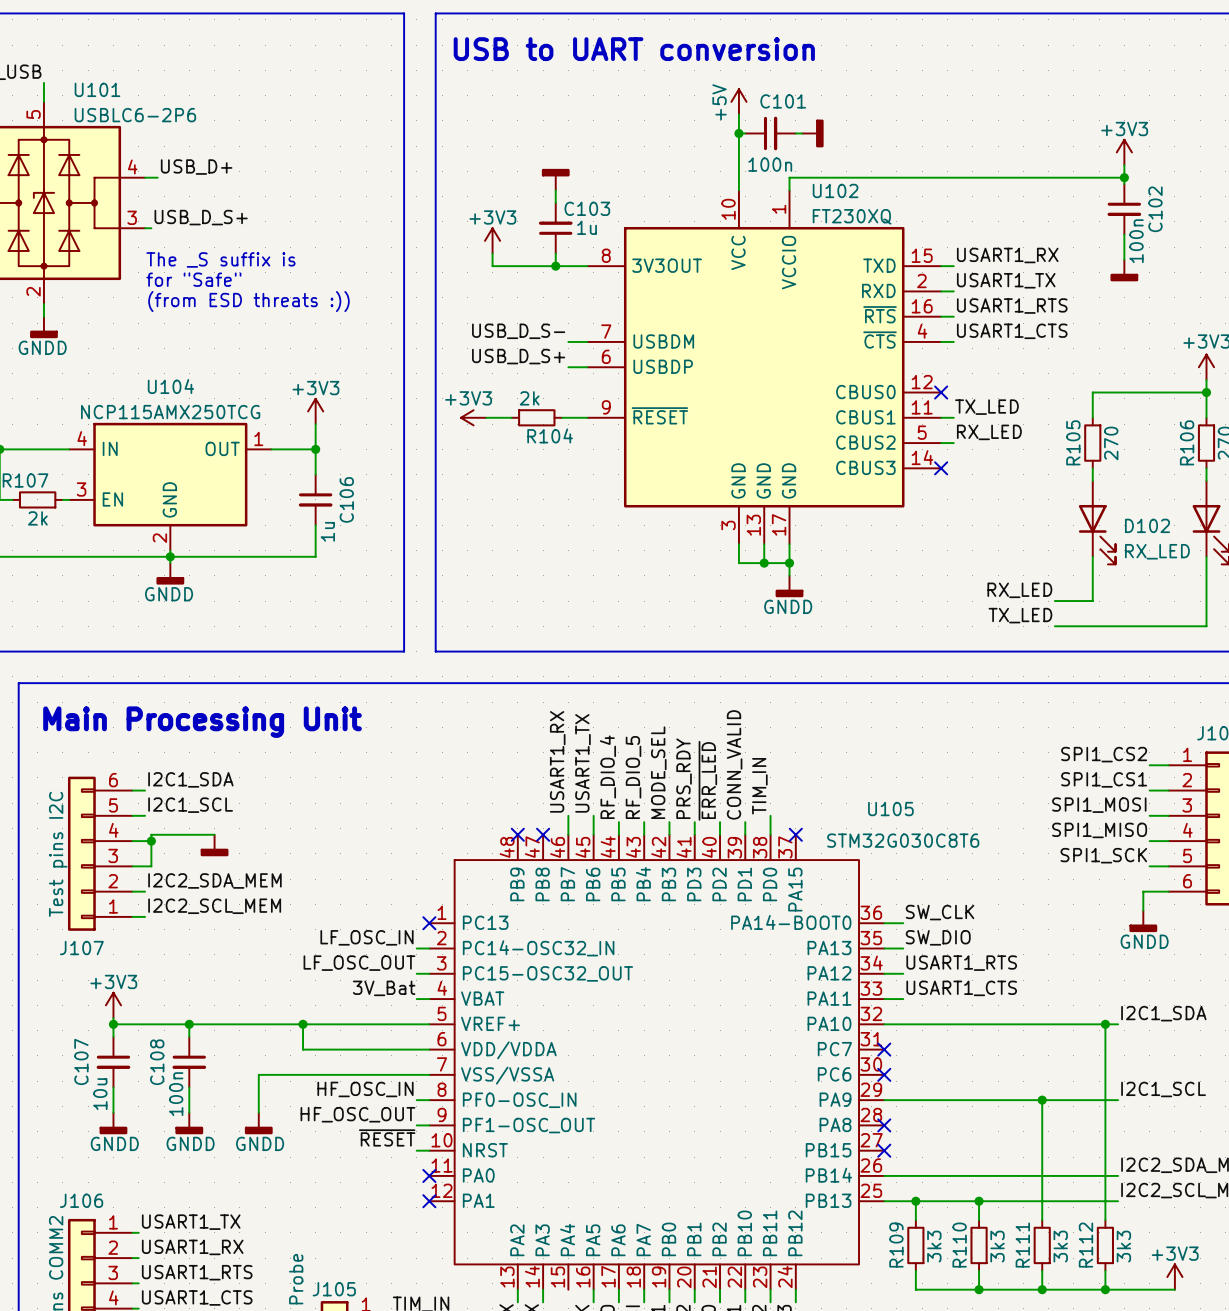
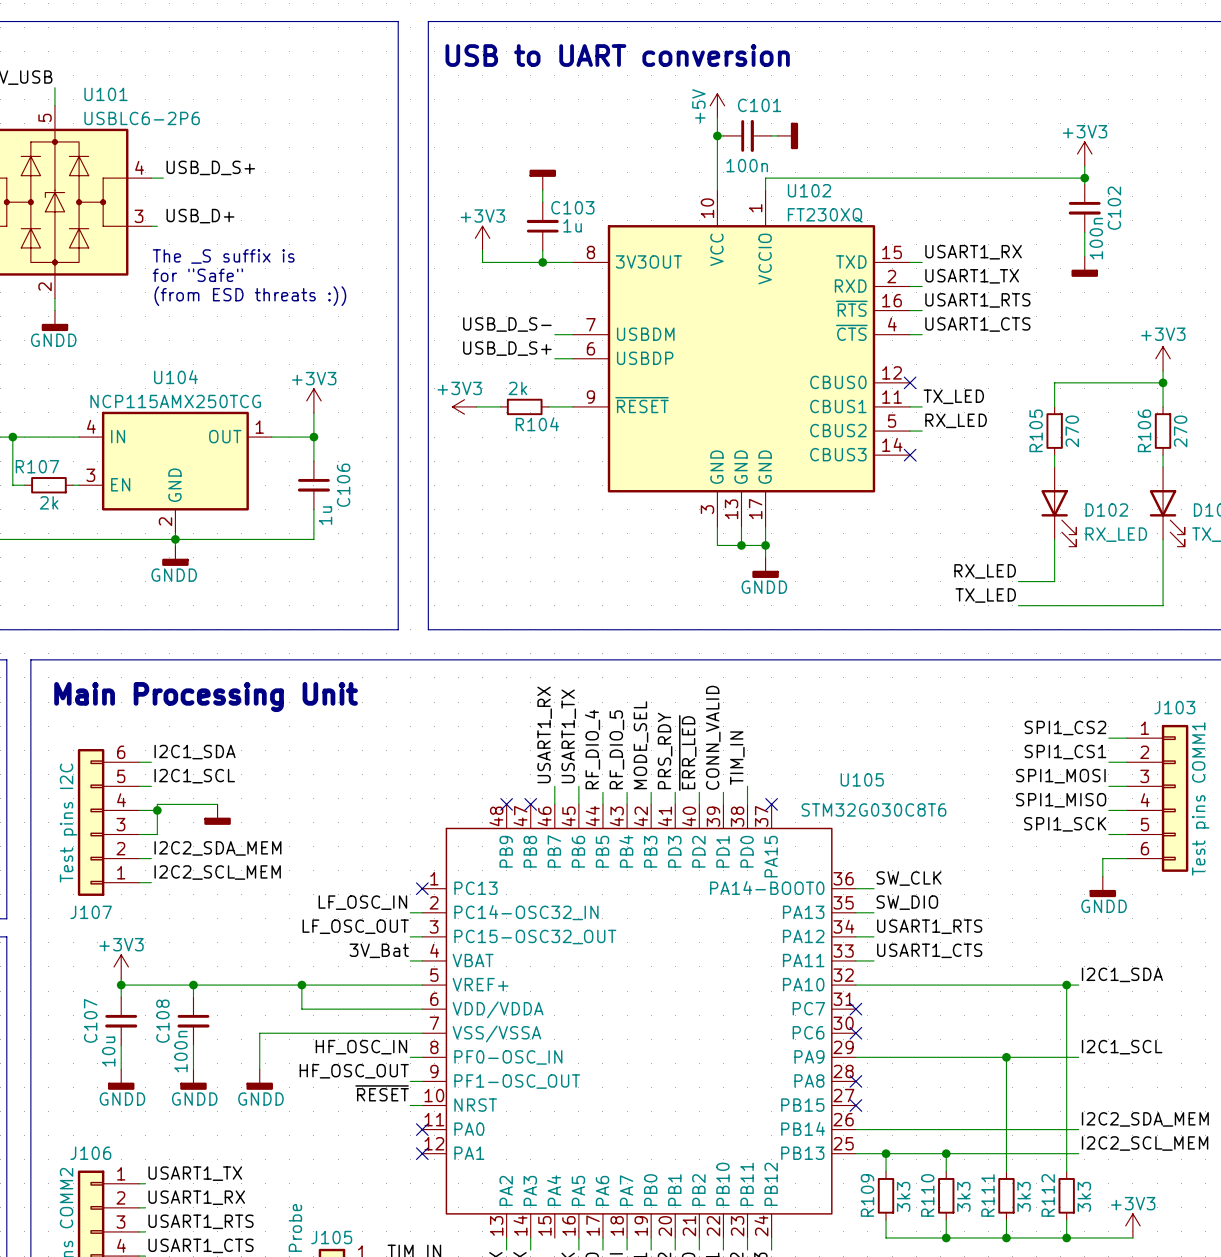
label: USB_D+ (196, 167) -> USB_D_S+ (210, 167)
label: USB_D_S+ (201, 217) -> USB_D+ (200, 216)

